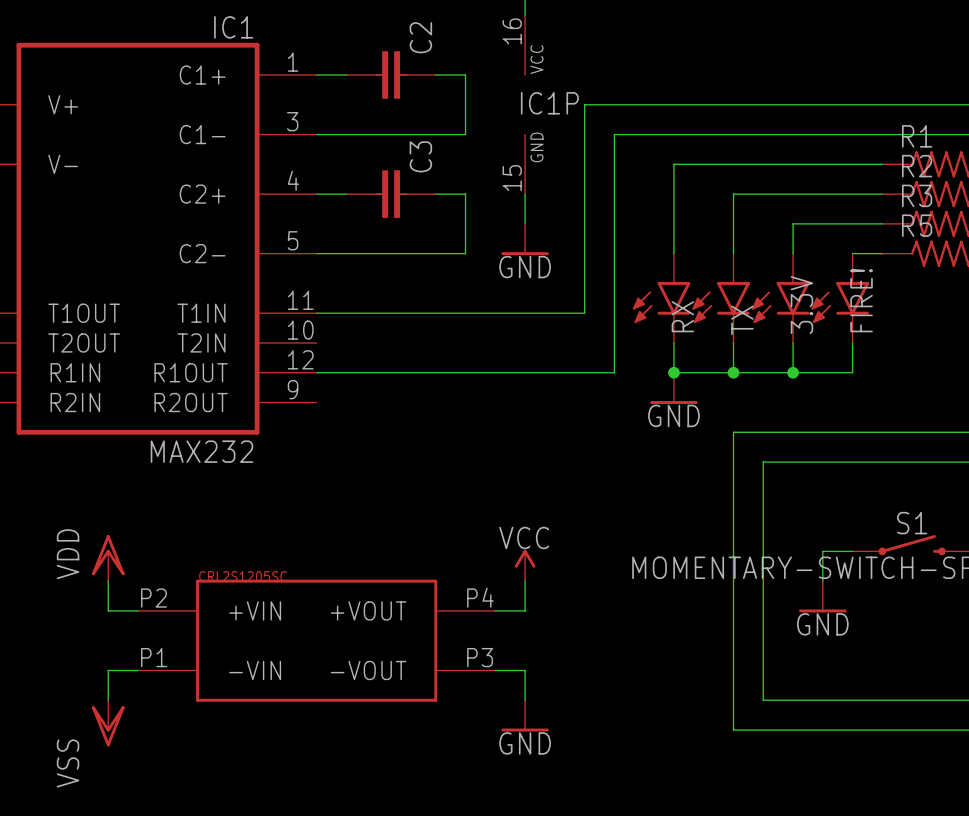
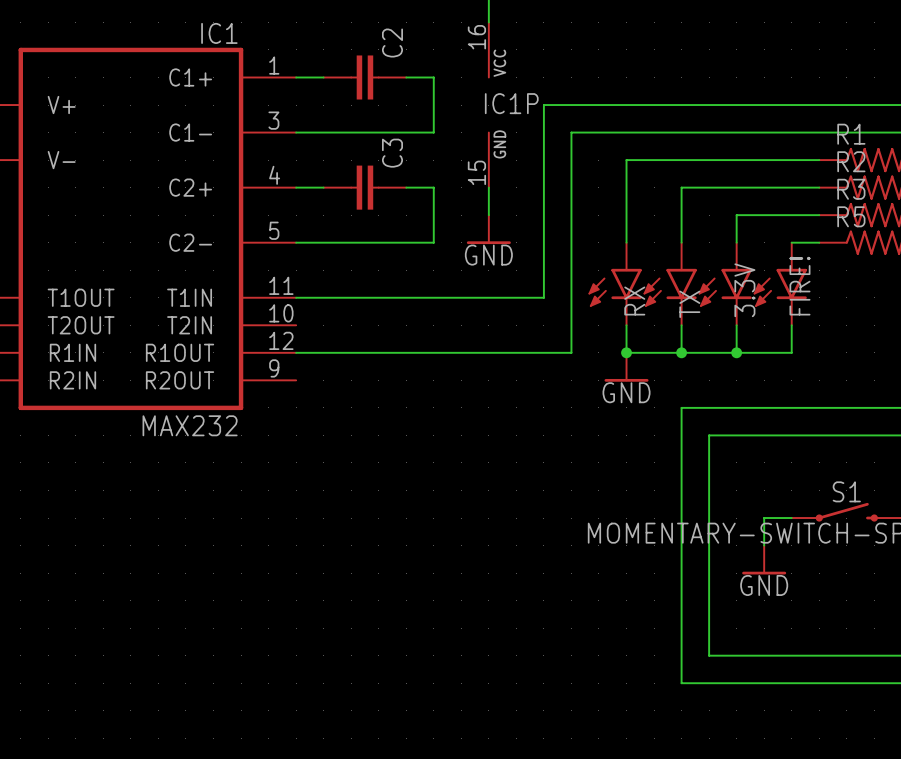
power symbol: VDD (108, 558) -> none
power symbol: VCC (525, 565) -> none
wire: (108, 581) (108, 610) (138, 610) -> none
wire: (525, 581) (525, 610) (495, 610) -> none
part: (316, 640) -> none
wire: (138, 670) (108, 670) (108, 700) -> none
wire: (495, 670) (525, 670) (525, 700) -> none
power symbol: GND (525, 715) -> none
power symbol: VSS (108, 723) -> none

